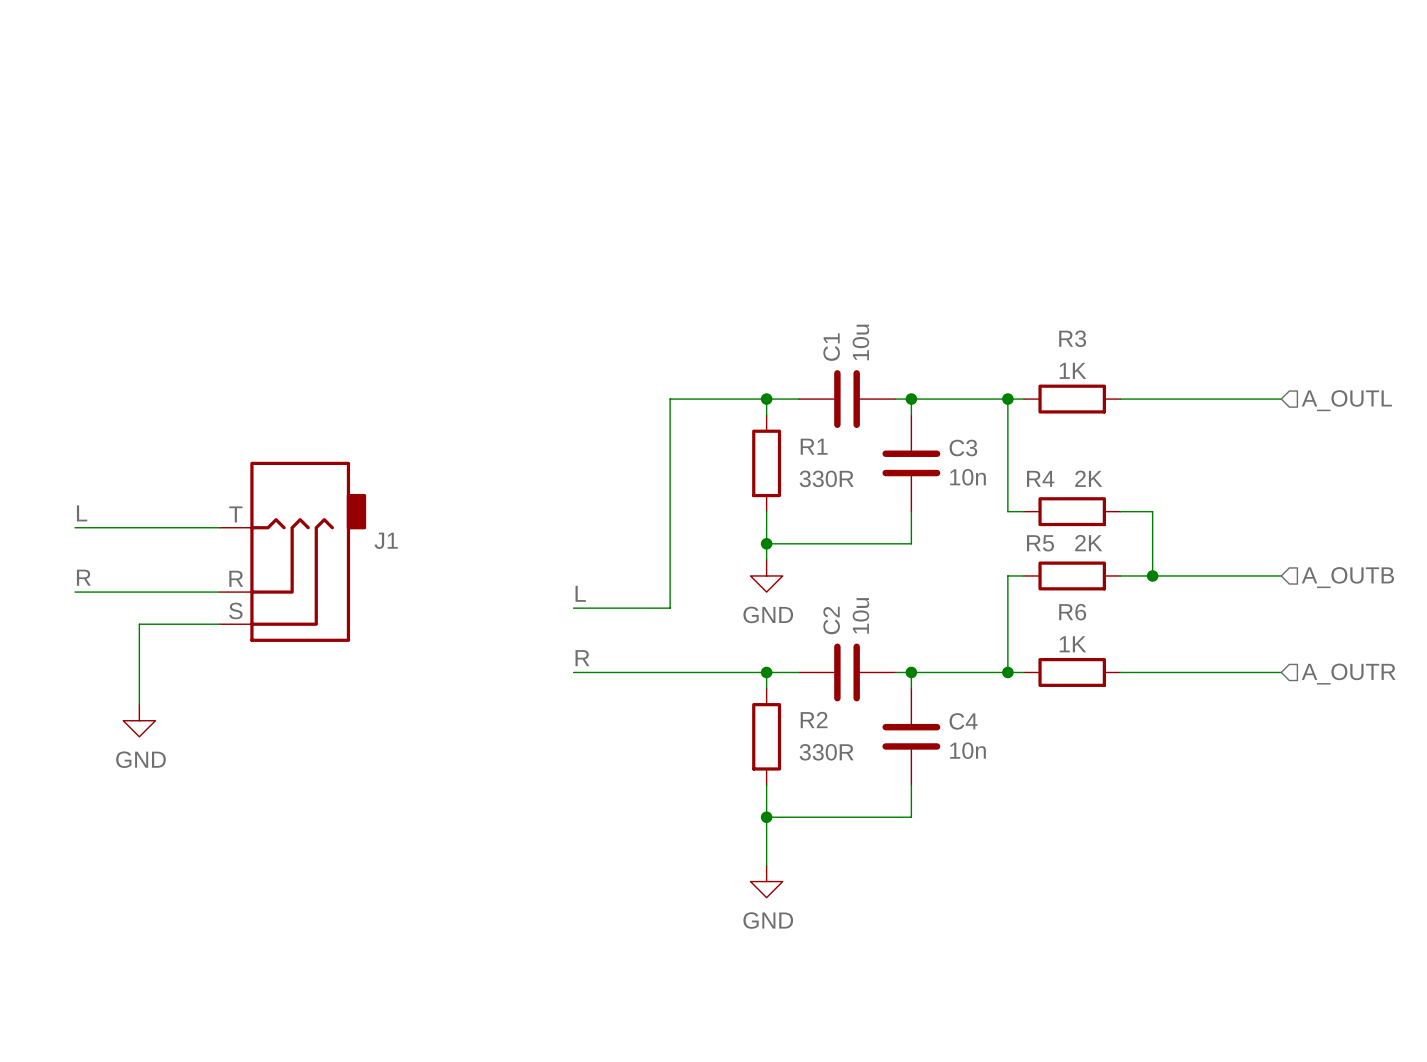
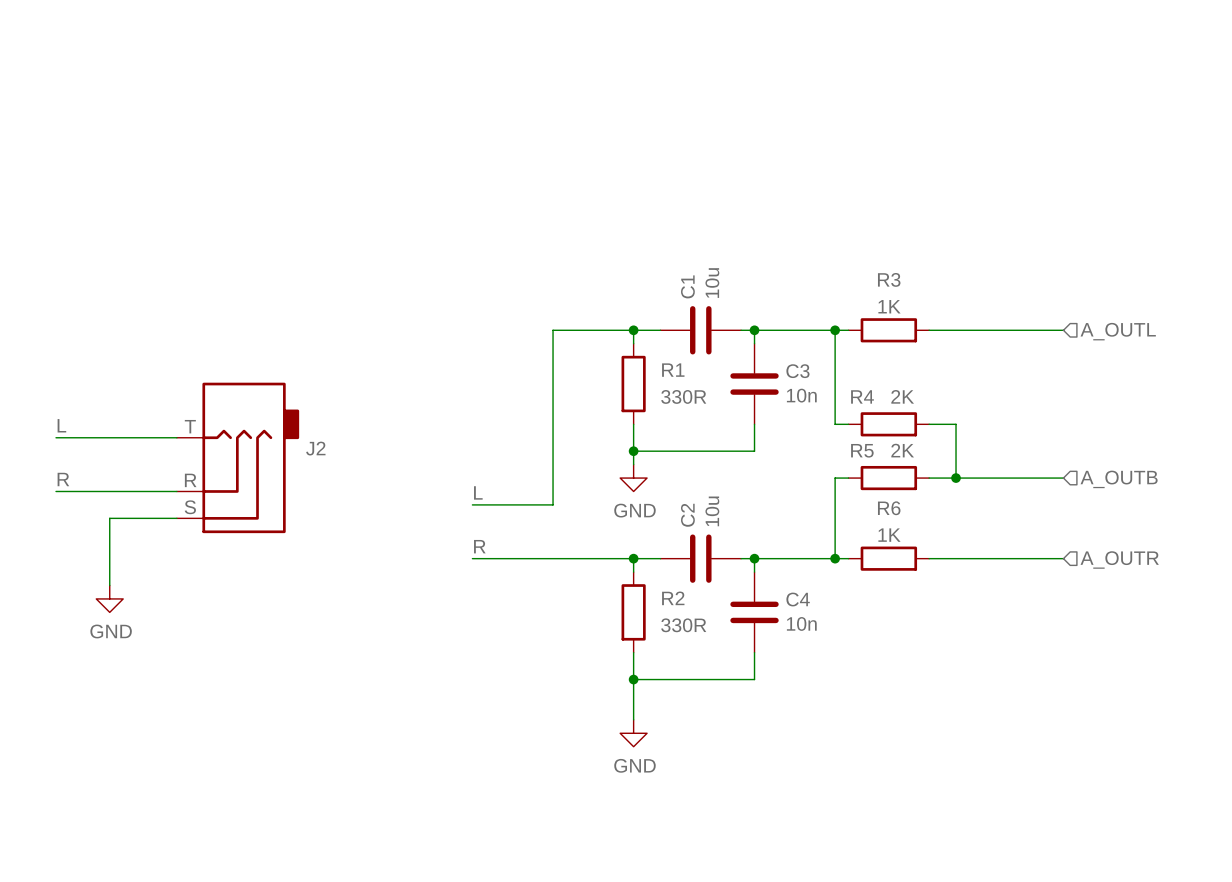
J1 name: J1 (386, 540) -> J2 (315, 448)

